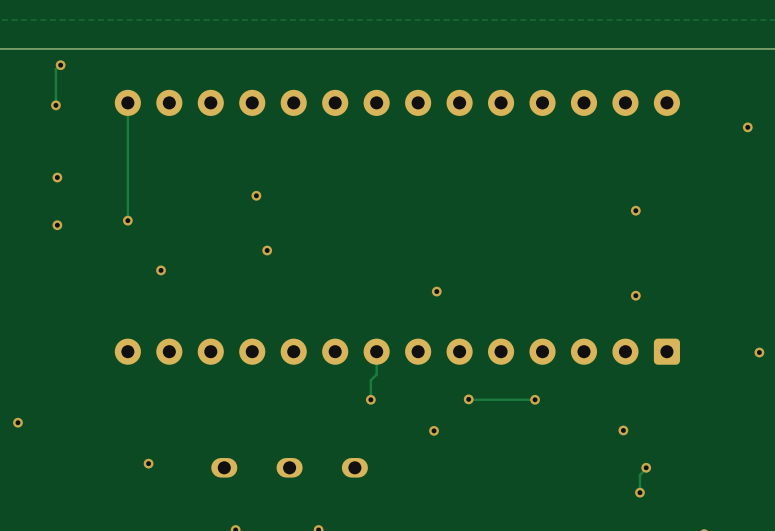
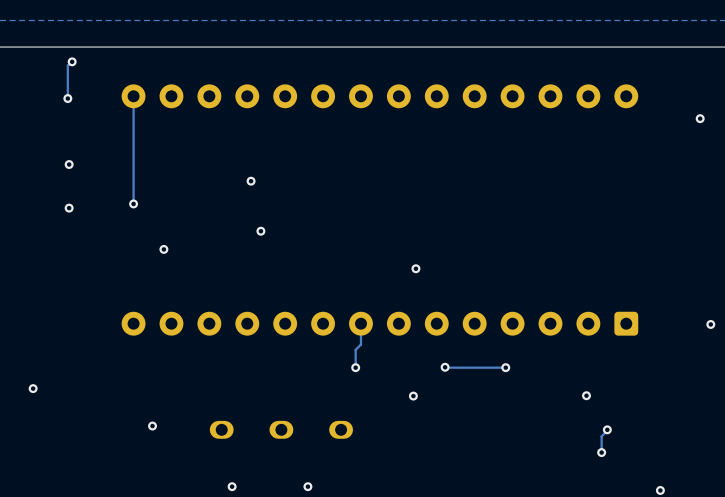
via: (635, 210) -> none
via: (635, 295) -> none

